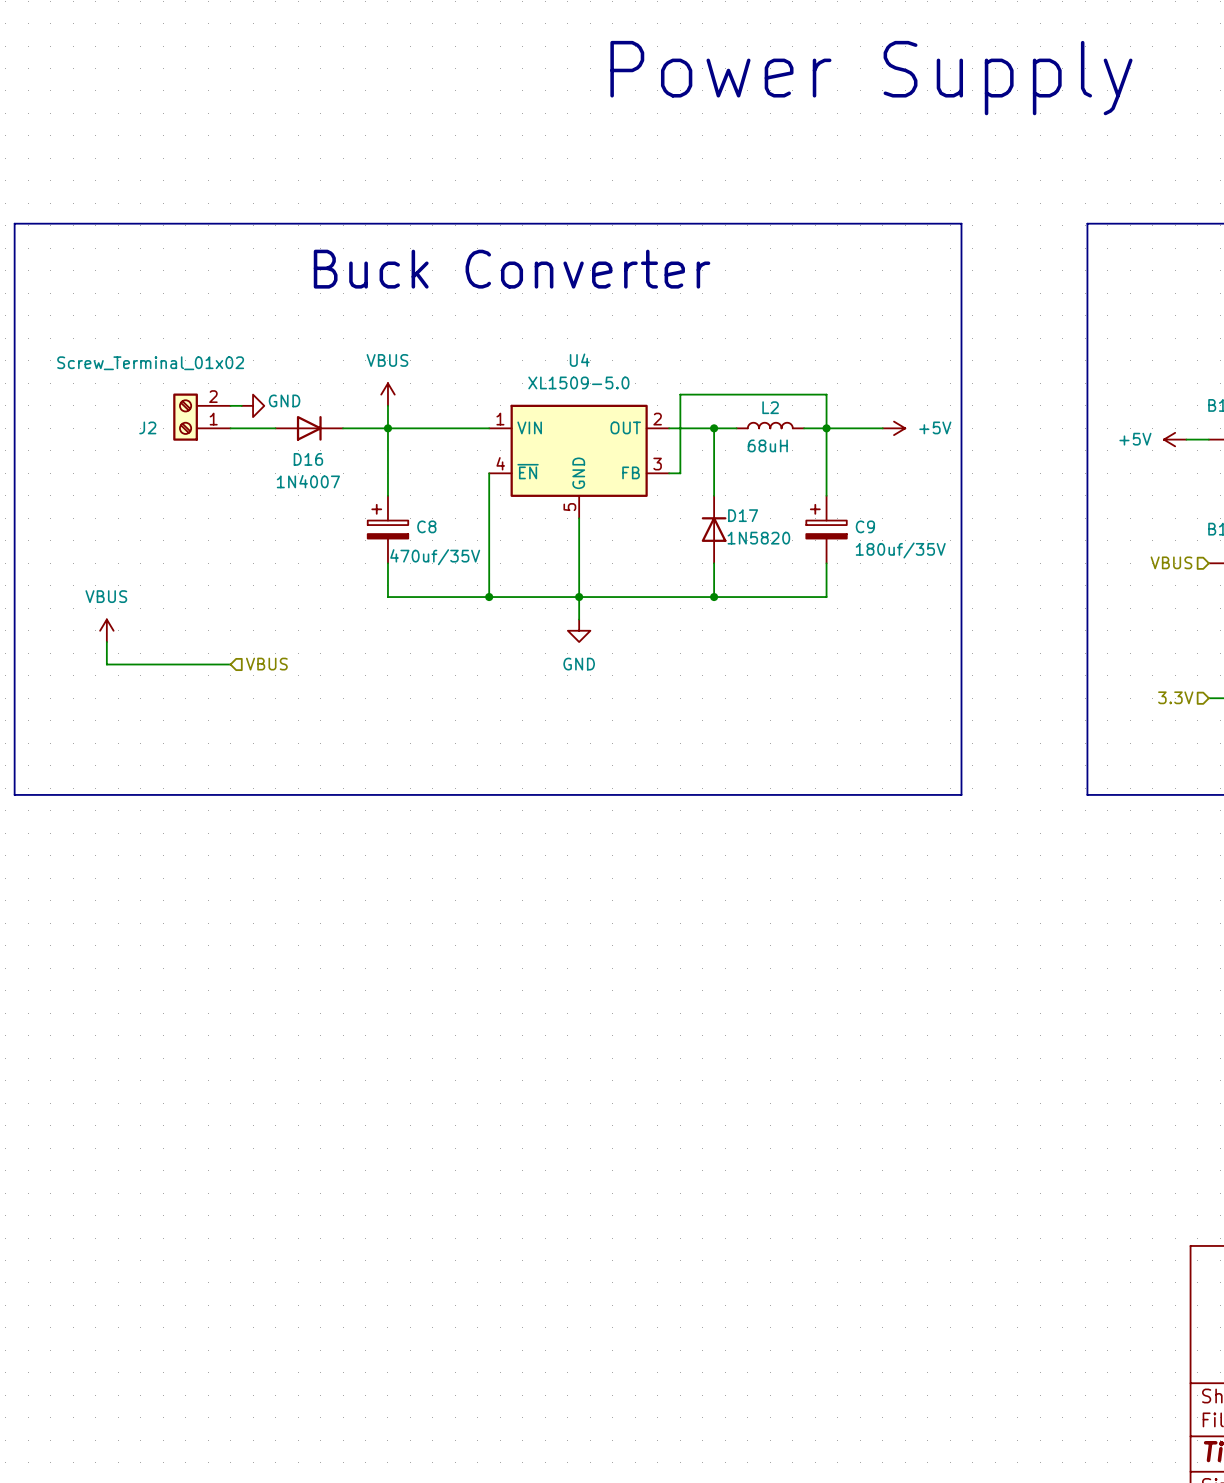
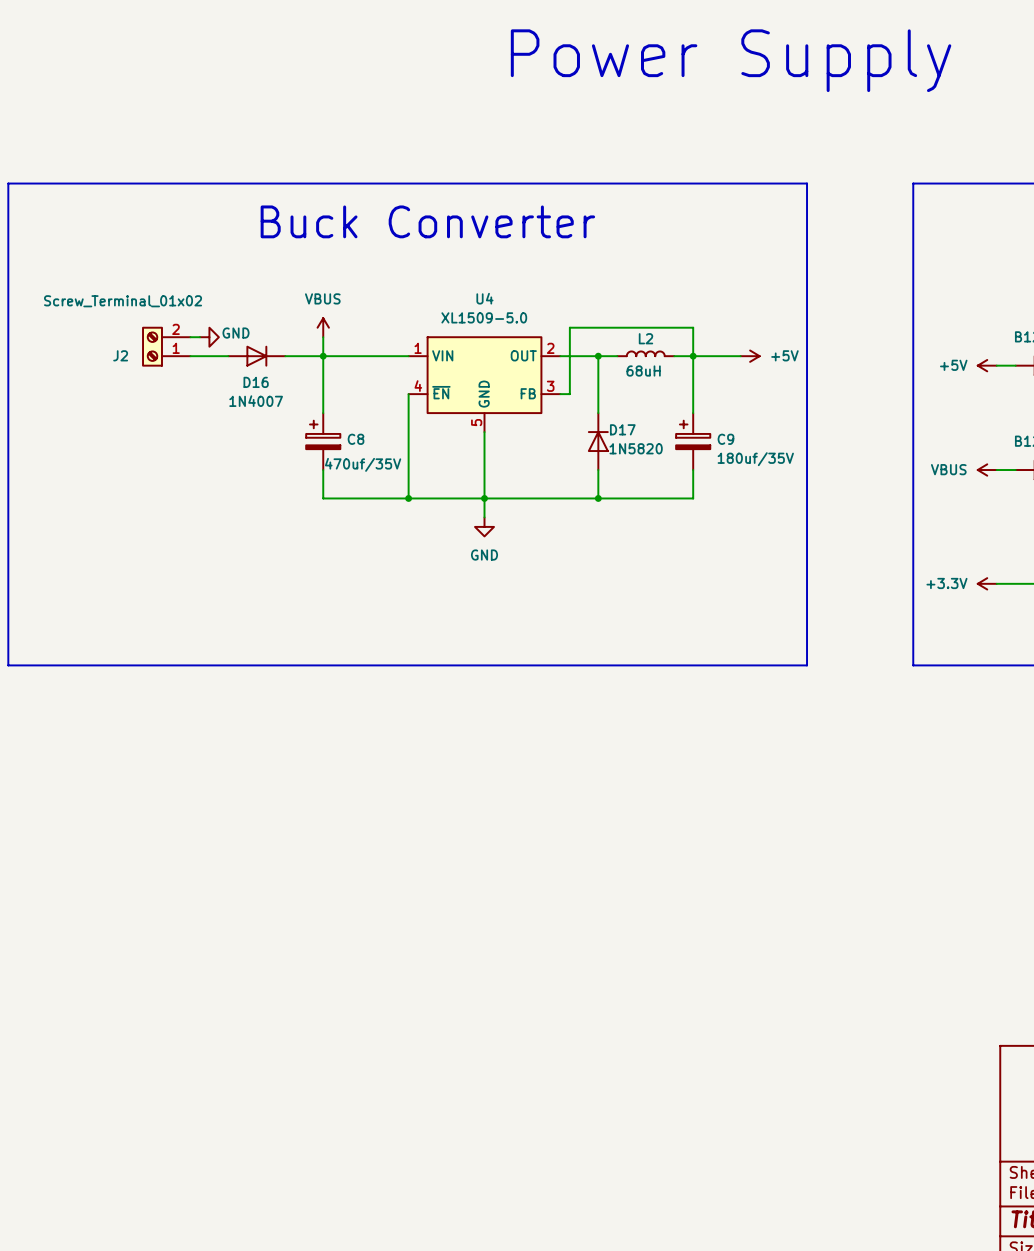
hierarchical label: VBUS (1171, 562) -> none
power symbol: none -> VBUS (987, 470)
wire: none -> (996, 470) (1015, 470)
power symbol: VBUS (106, 630) -> none
wire: (106, 642) (106, 664) (230, 664) -> none
hierarchical label: VBUS (266, 664) -> none
hierarchical label: 3.3V (1175, 697) -> none
power symbol: none -> +3.3V (987, 583)
wire: none -> (996, 583) (1015, 583)

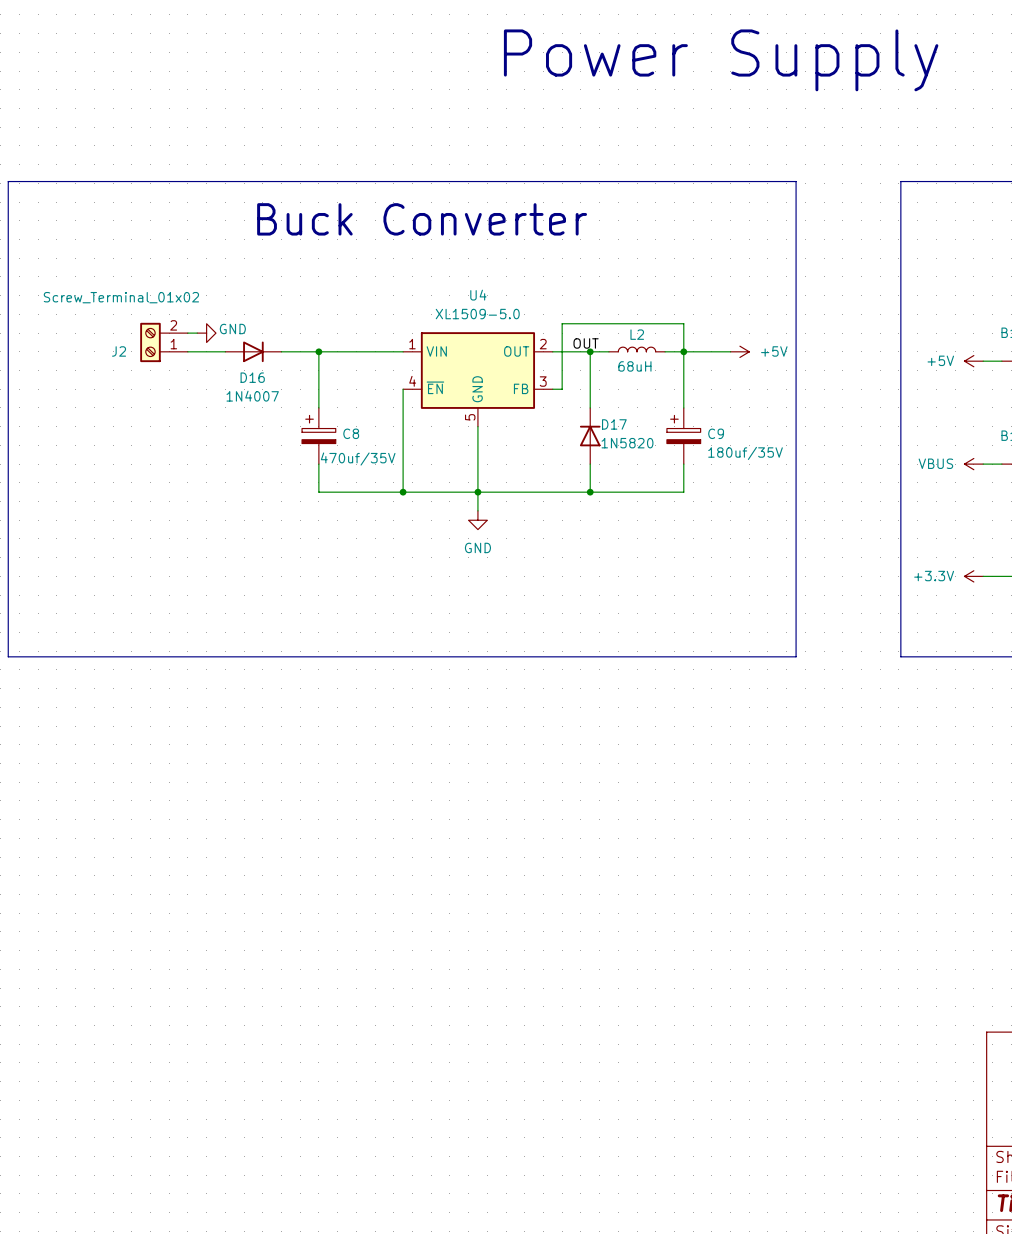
power symbol: VBUS (323, 327) -> none
wire: (323, 337) (323, 356) -> none
label: none -> OUT (586, 343)

